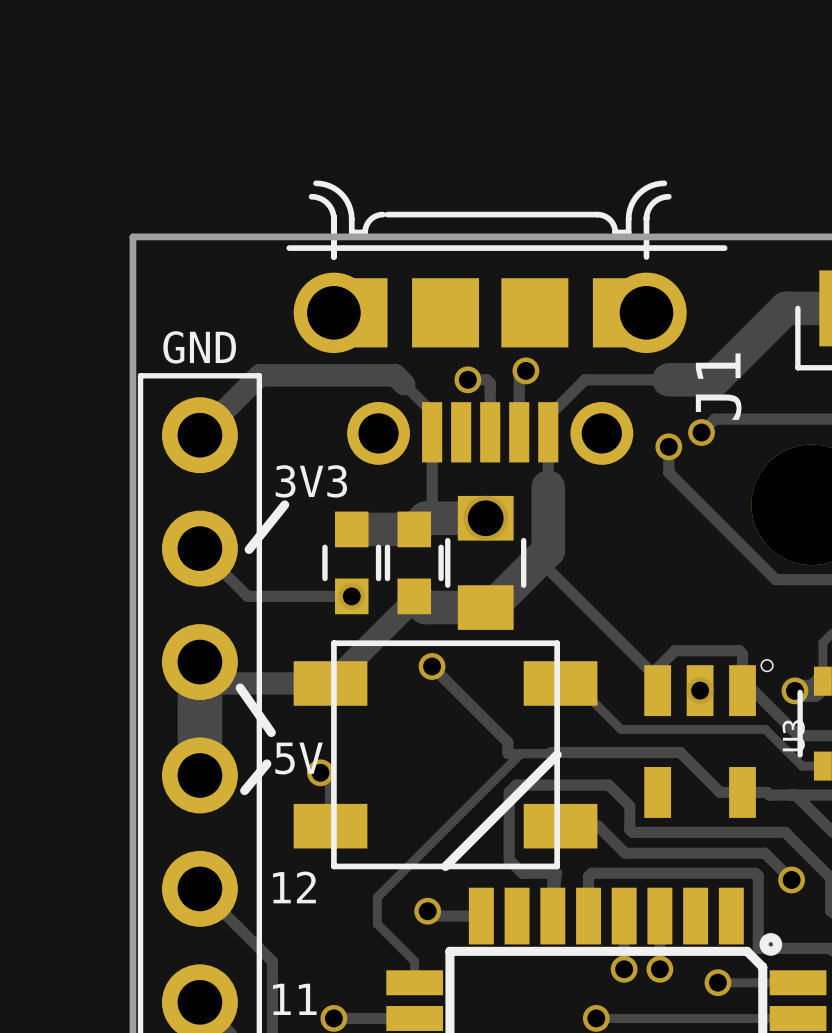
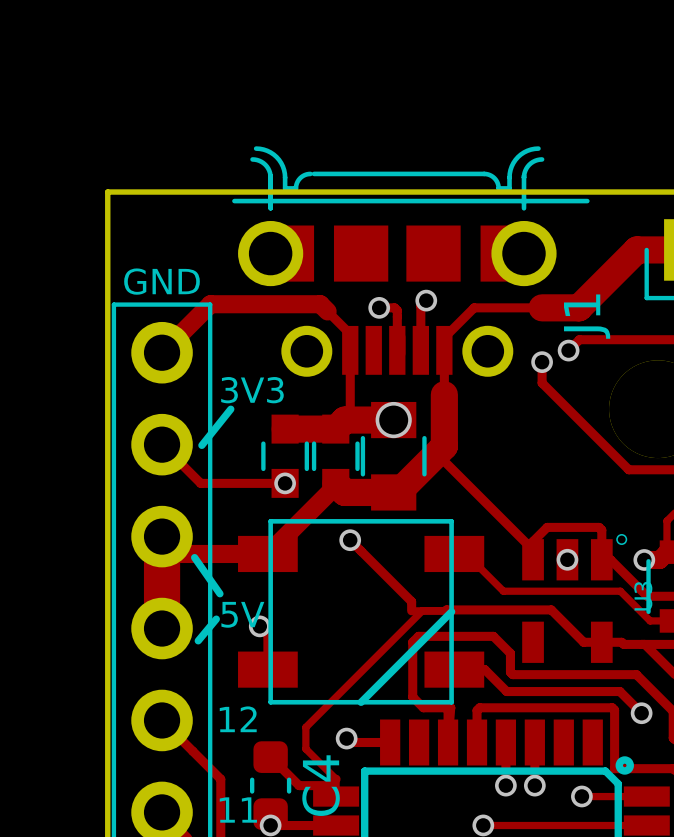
track: none -> (270, 757) (299, 785) (329, 785) (336, 779)
C4: none -> (270, 785)

